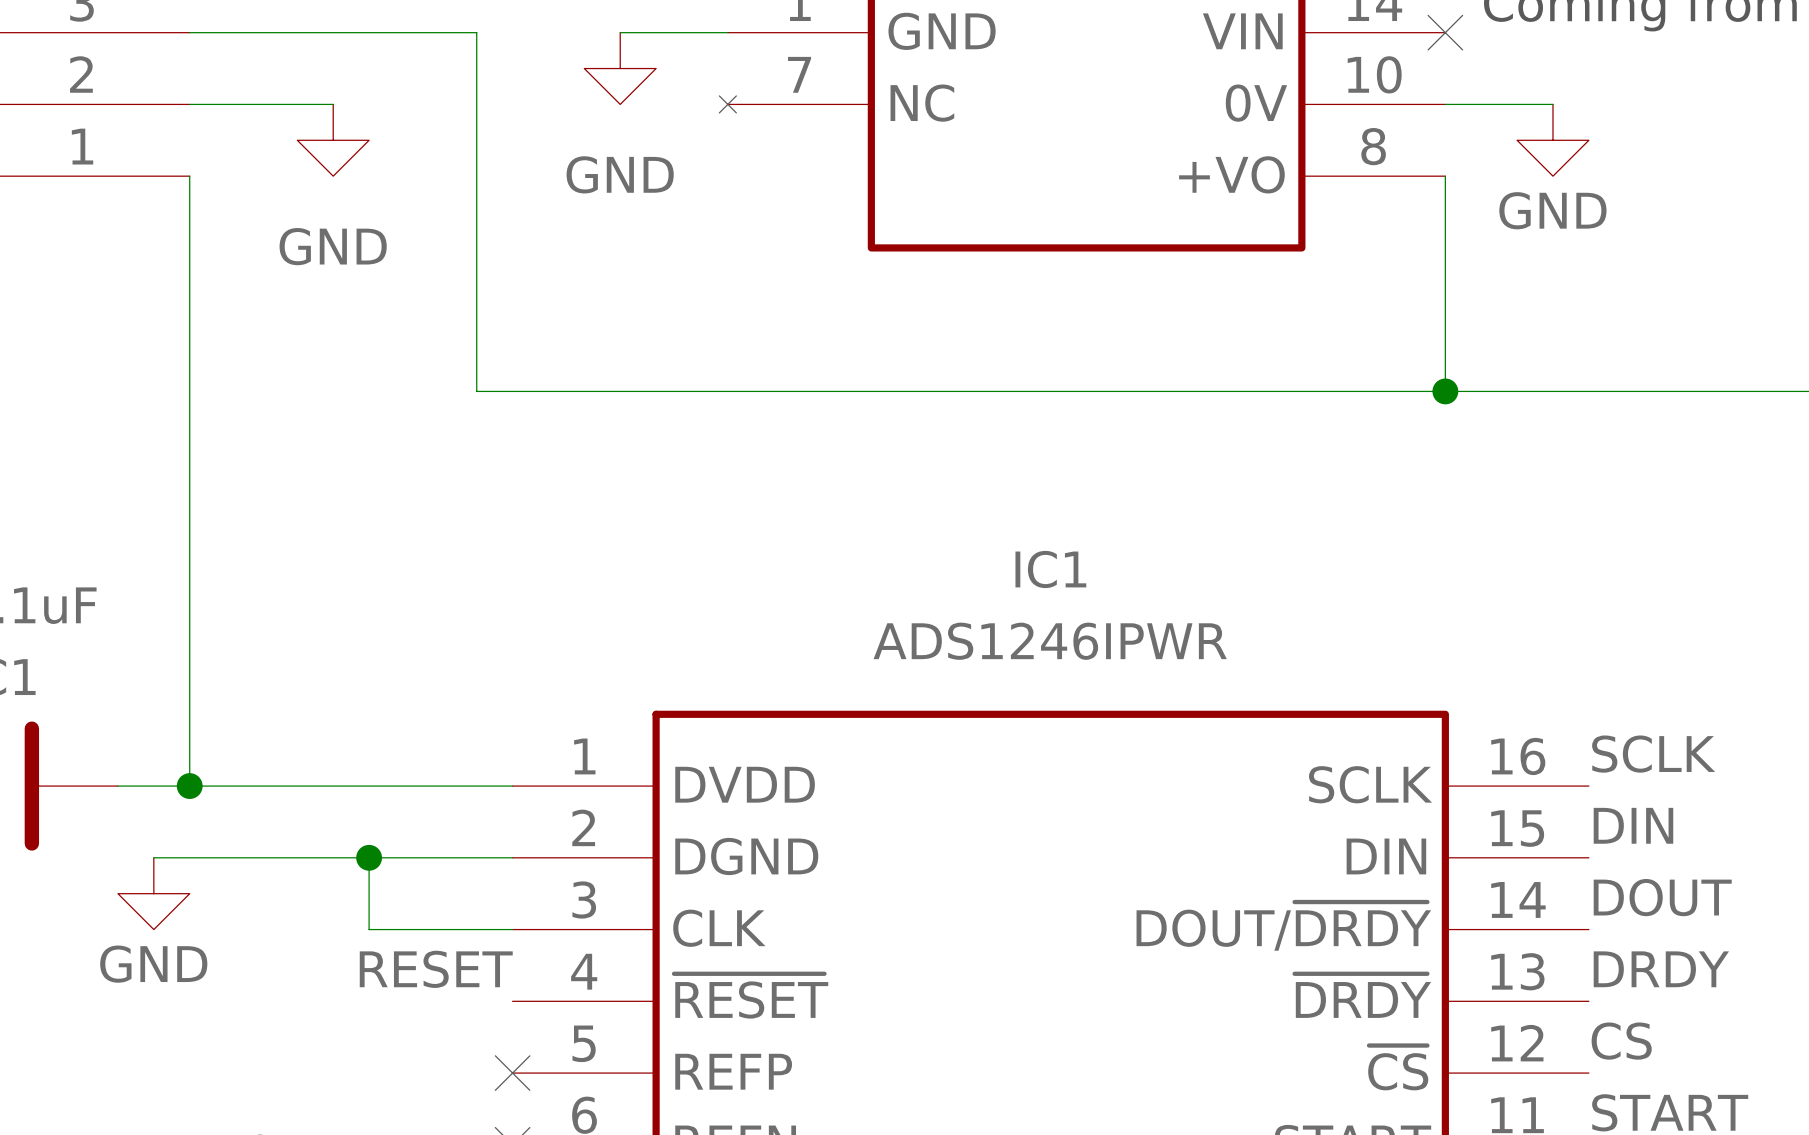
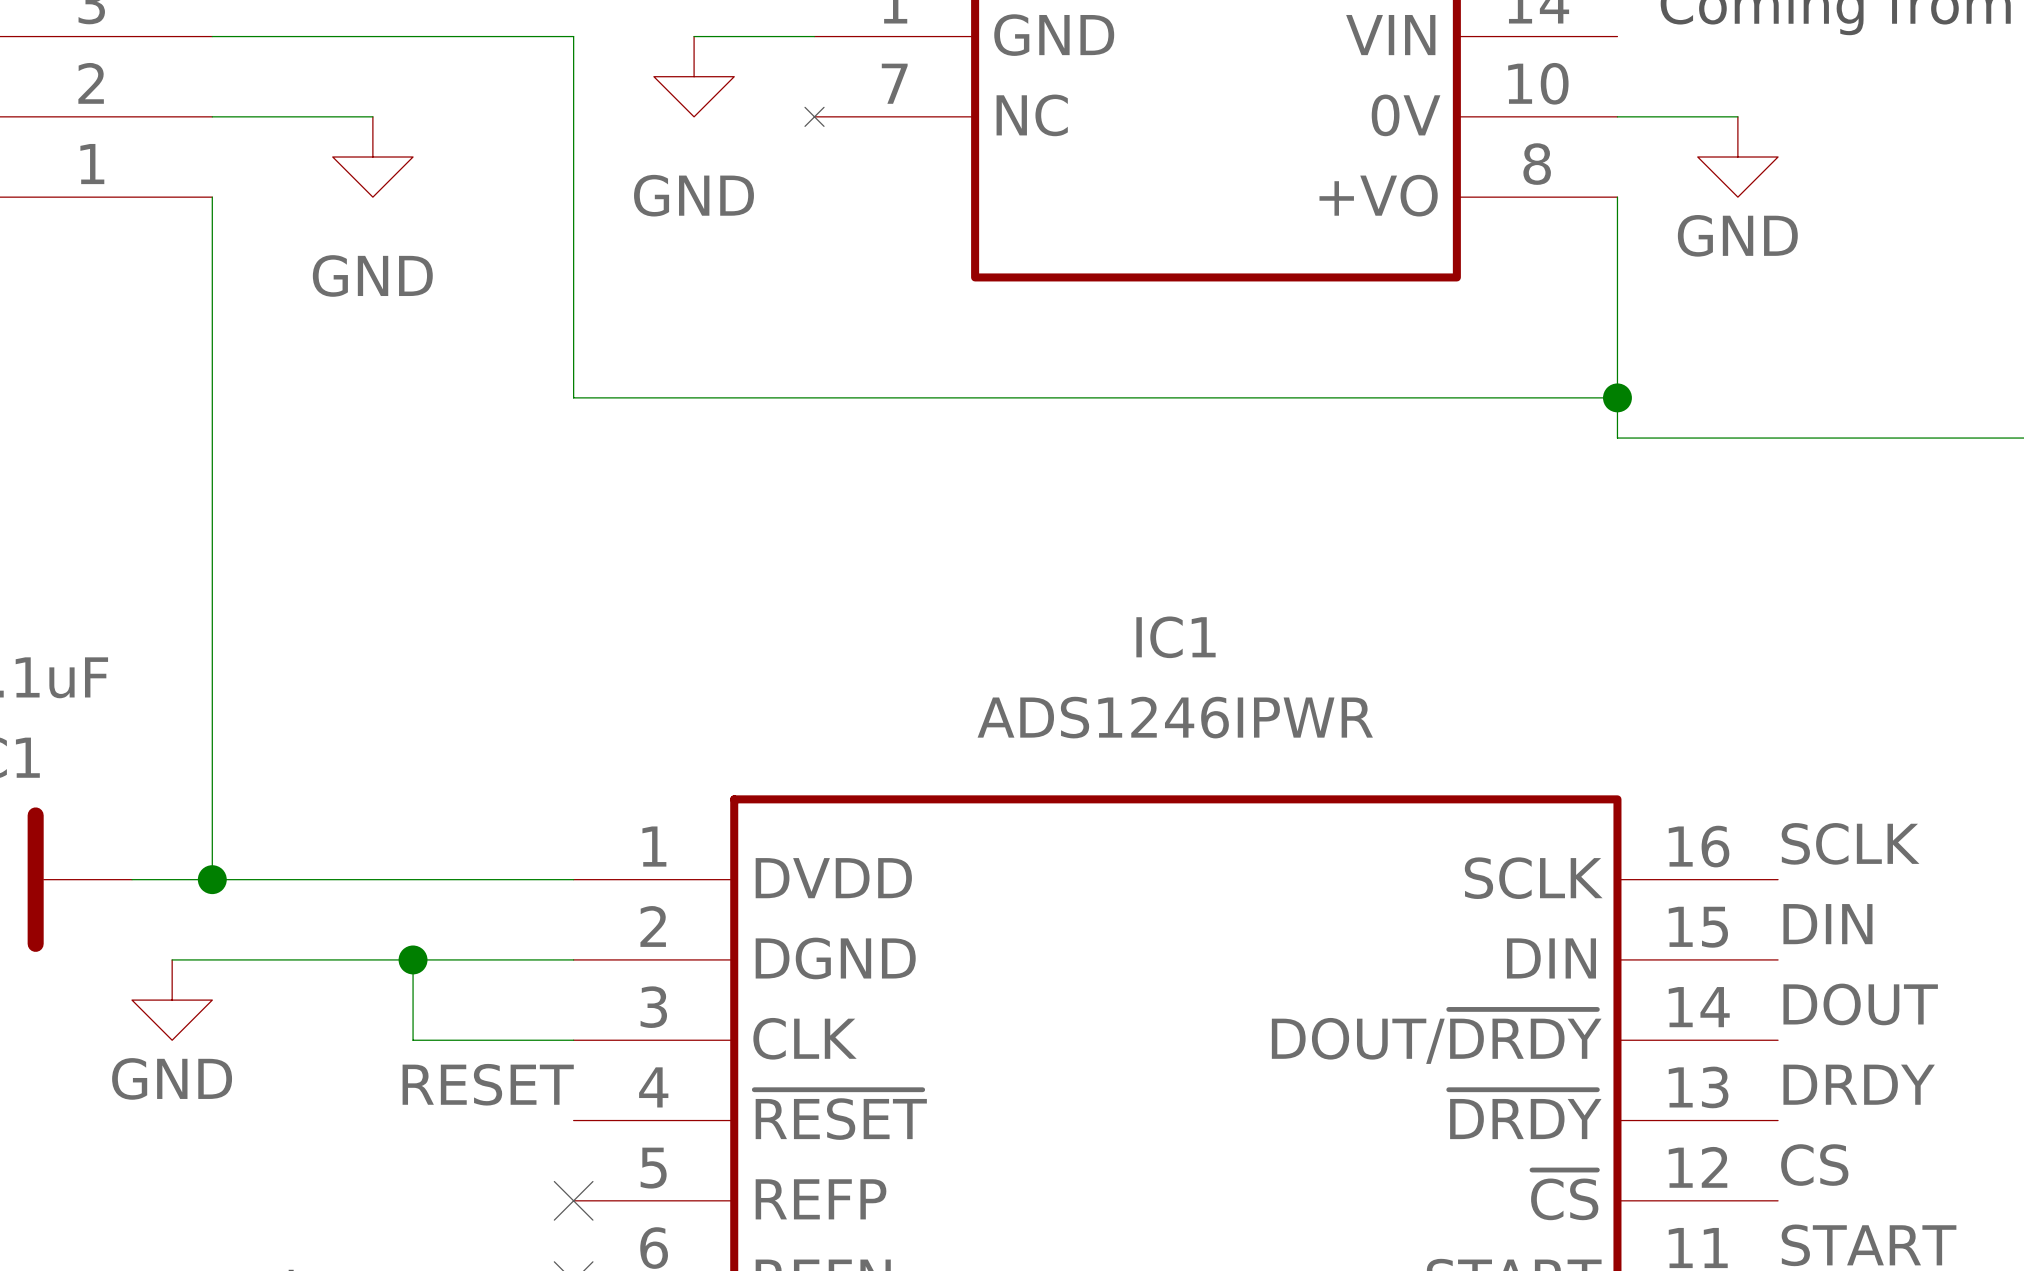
wire: (476, 32) (476, 391) (1445, 391) -> (533, 36) (573, 36) (573, 397) (1617, 397)
no-connect mark: (1445, 32) -> none
junction position: (1445, 391) -> (1617, 397)

